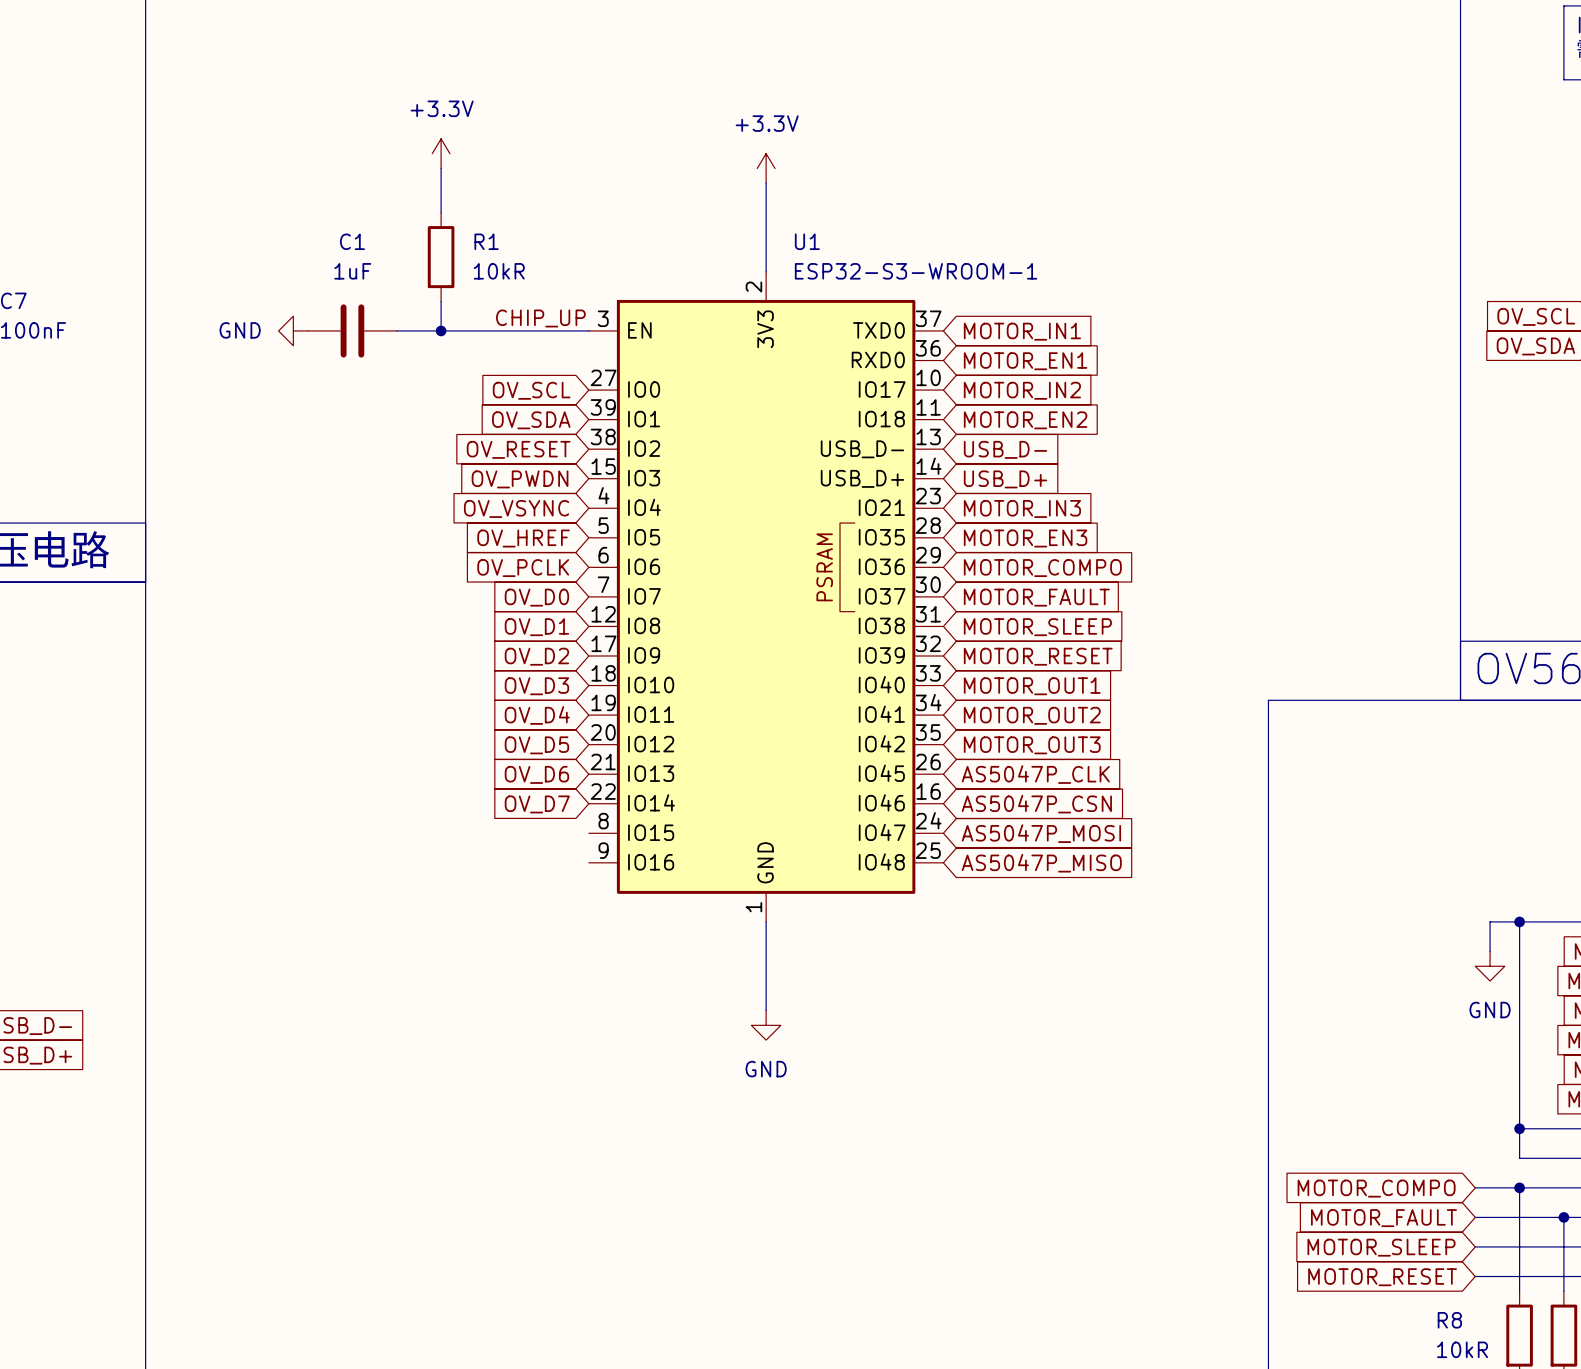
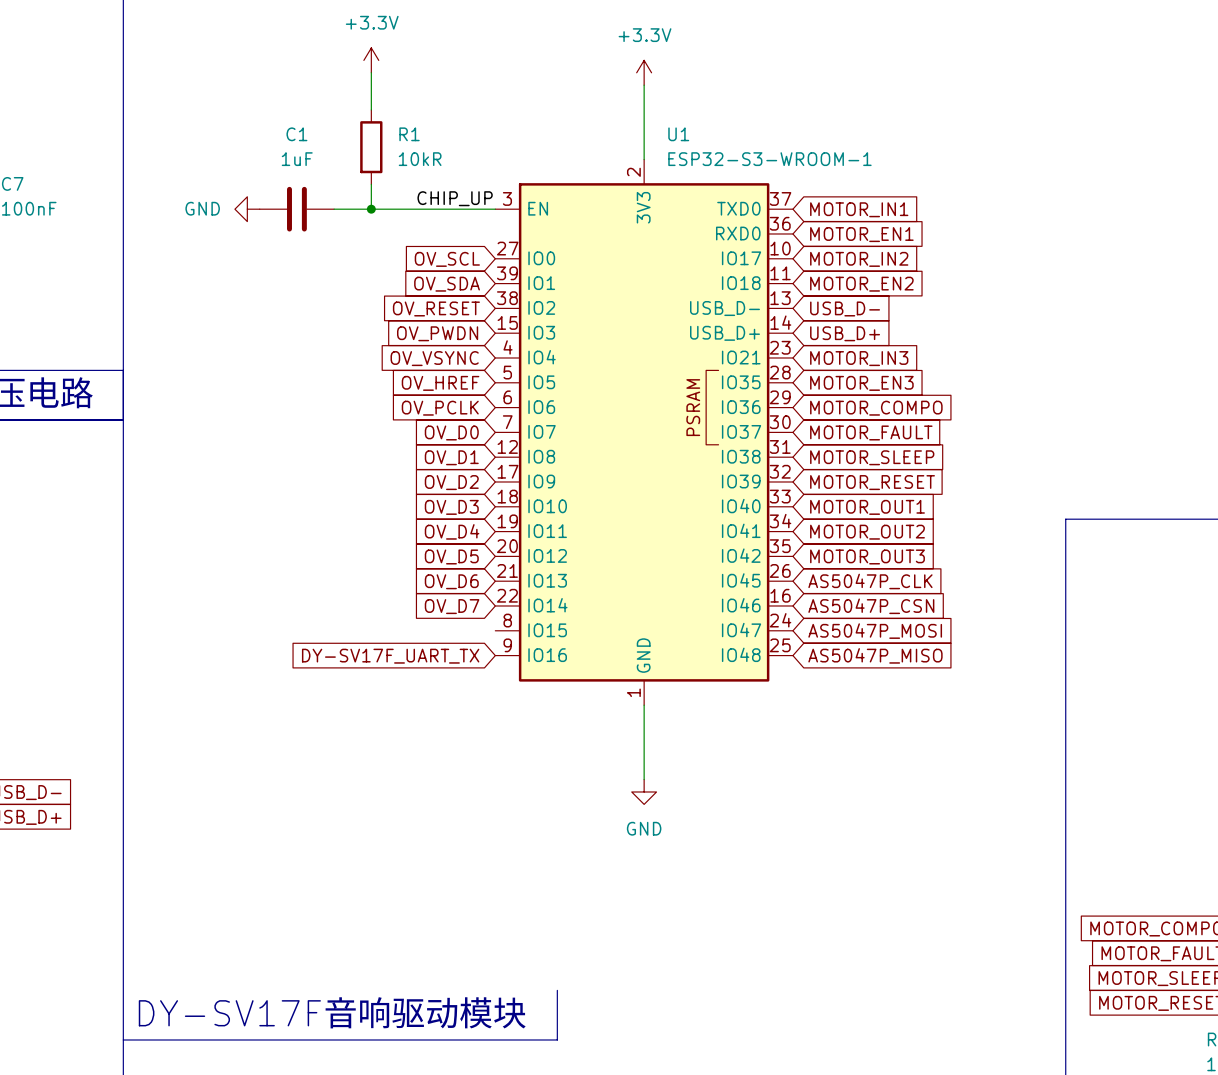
global label: none -> DY-SV17F_UART_TX (390, 656)
line: none -> (557, 990) (557, 1039) (123, 1039)
text: none -> DY-SV17F音响驱动模块 (332, 1012)

